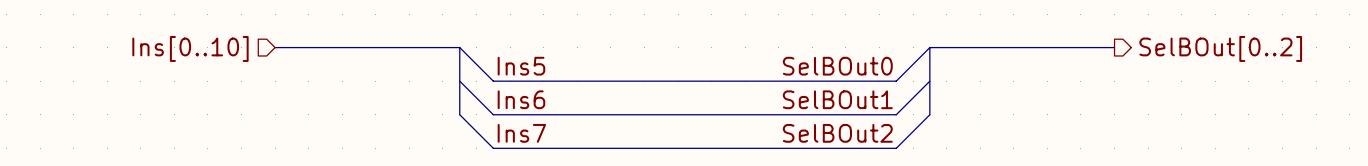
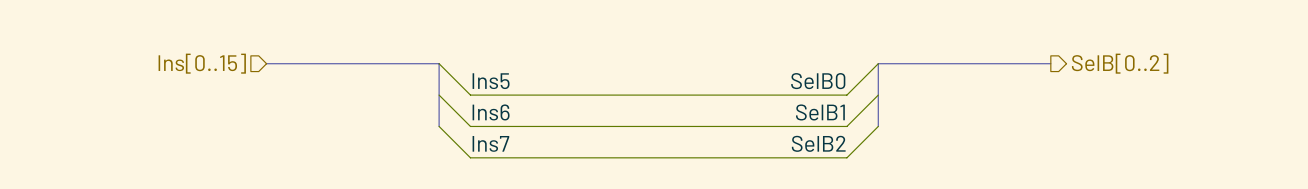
hierarchical label: Ins[0..10] (190, 48) -> Ins[0..15] (202, 63)
hierarchical label: SelBOut[0..2] (1220, 48) -> SelB[0..2] (1120, 63)
label: SelBOut0 (837, 66) -> SelB0 (818, 81)
label: SelBOut1 (837, 99) -> SelB1 (820, 112)
label: SelBOut2 (837, 133) -> SelB2 (818, 143)

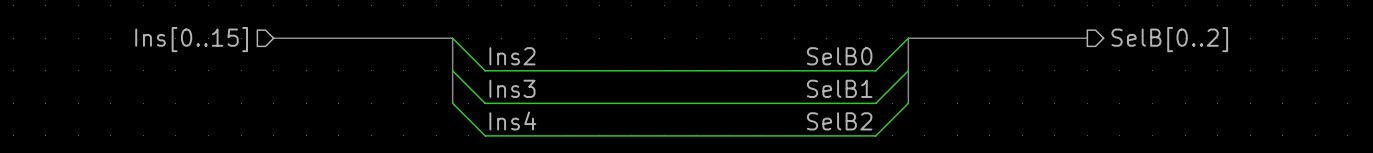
label: Ins5 (491, 81) -> Ins2 (512, 56)
label: Ins6 (491, 112) -> Ins3 (512, 88)
label: Ins7 (490, 143) -> Ins4 (512, 120)

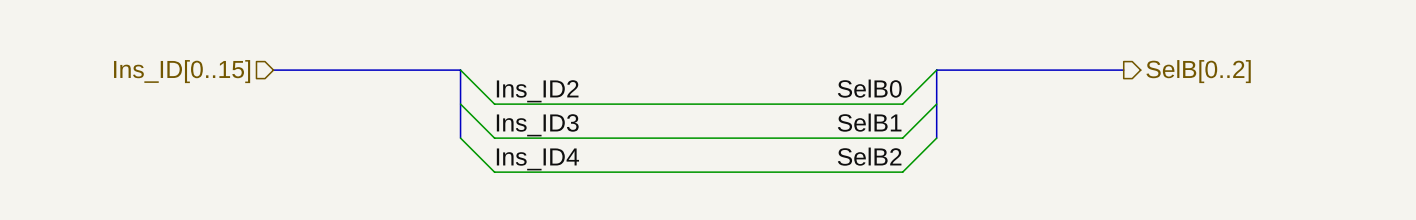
hierarchical label: Ins[0..15] (191, 39) -> Ins_ID[0..15] (182, 71)
label: Ins2 (512, 56) -> Ins_ID2 (537, 91)
label: Ins3 (512, 88) -> Ins_ID3 (537, 125)
label: Ins4 (512, 120) -> Ins_ID4 (537, 159)

